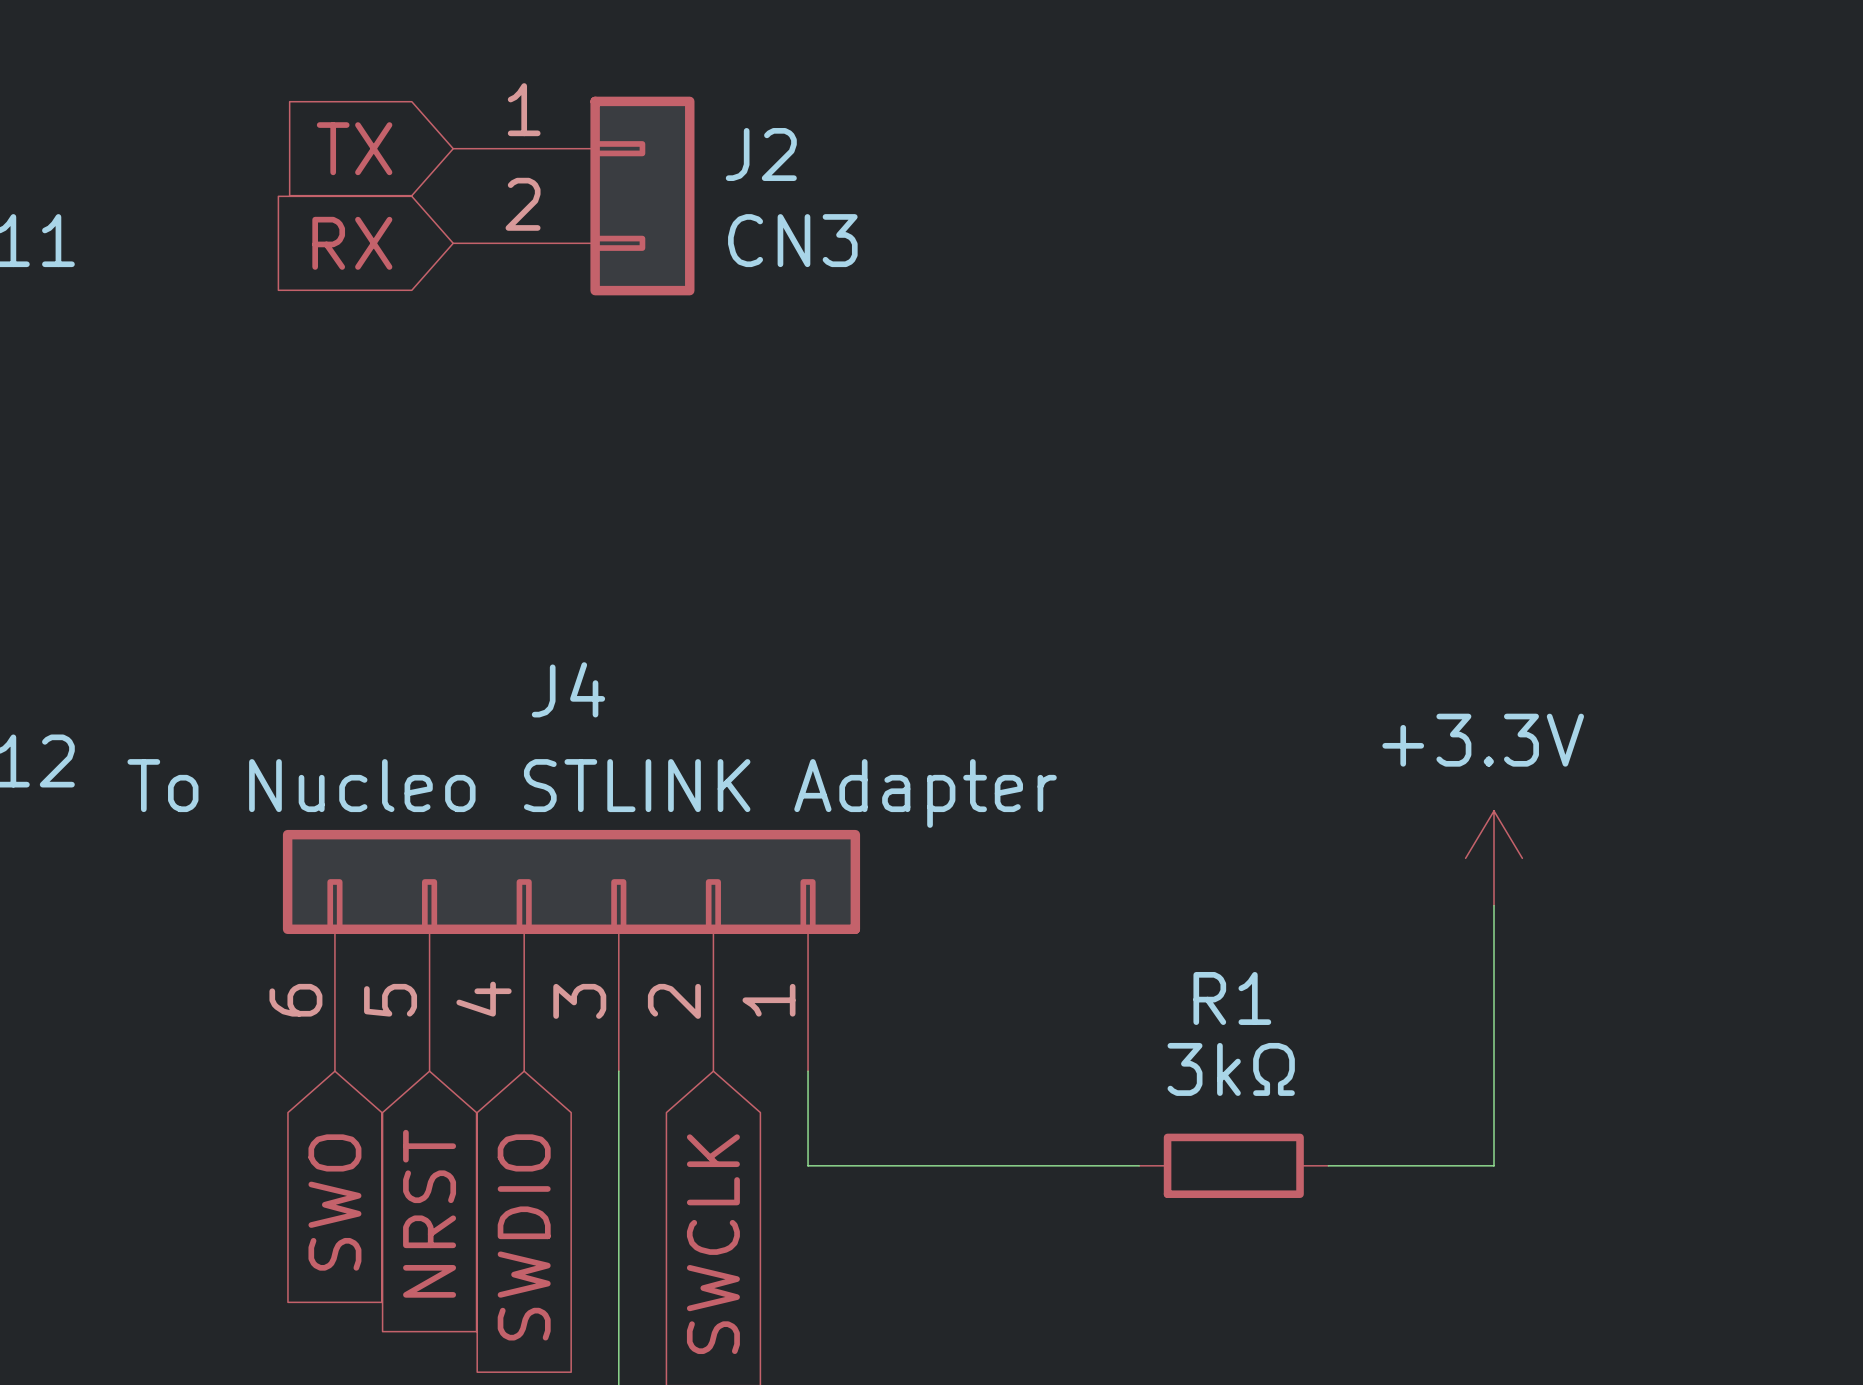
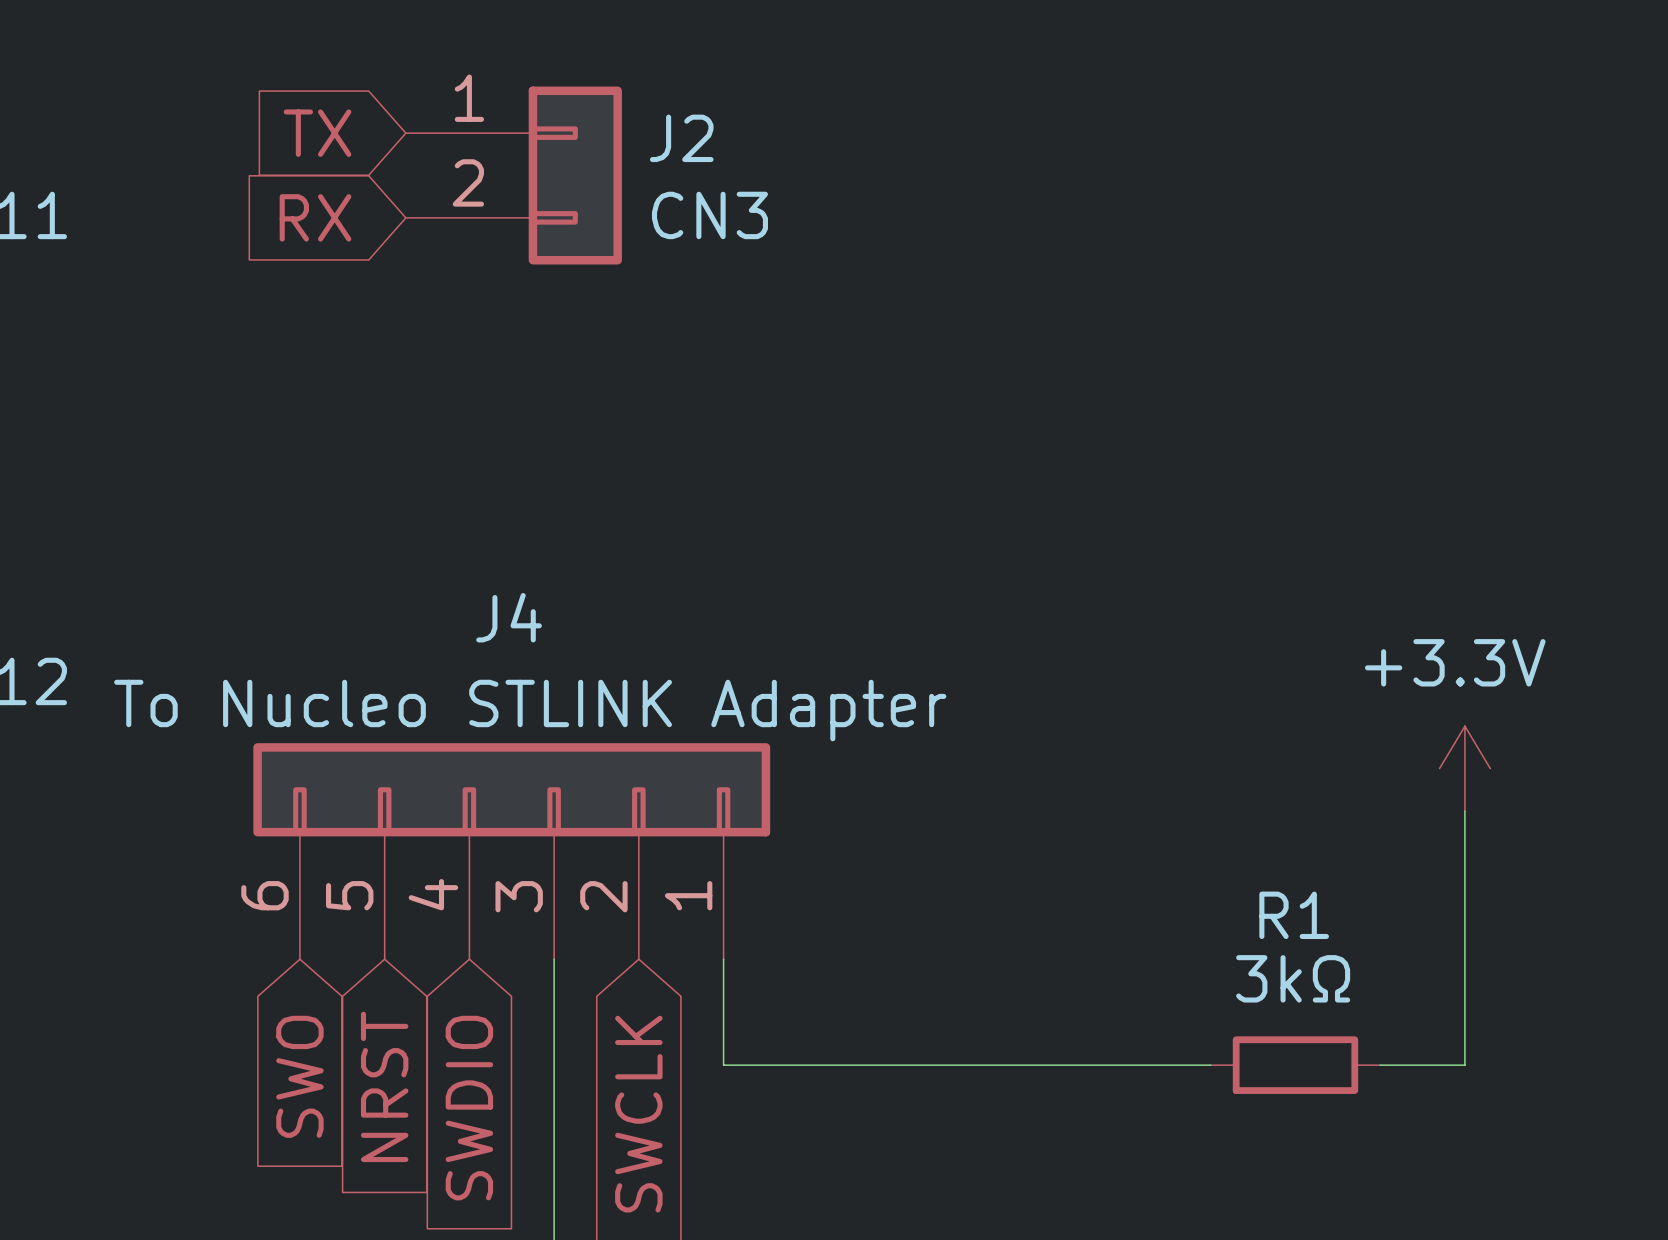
power symbol position: +3.3V (1493, 858) -> +3.3V (1464, 768)
wire: (1493, 905) (1493, 1165) (1328, 1165) -> none
wire: none -> (1464, 810) (1464, 1065) (1380, 1065)
wire: (808, 1165) (1139, 1165) -> (723, 1043) (723, 1065) (1210, 1065)
R1 position: (1233, 1165) -> (1295, 1065)

